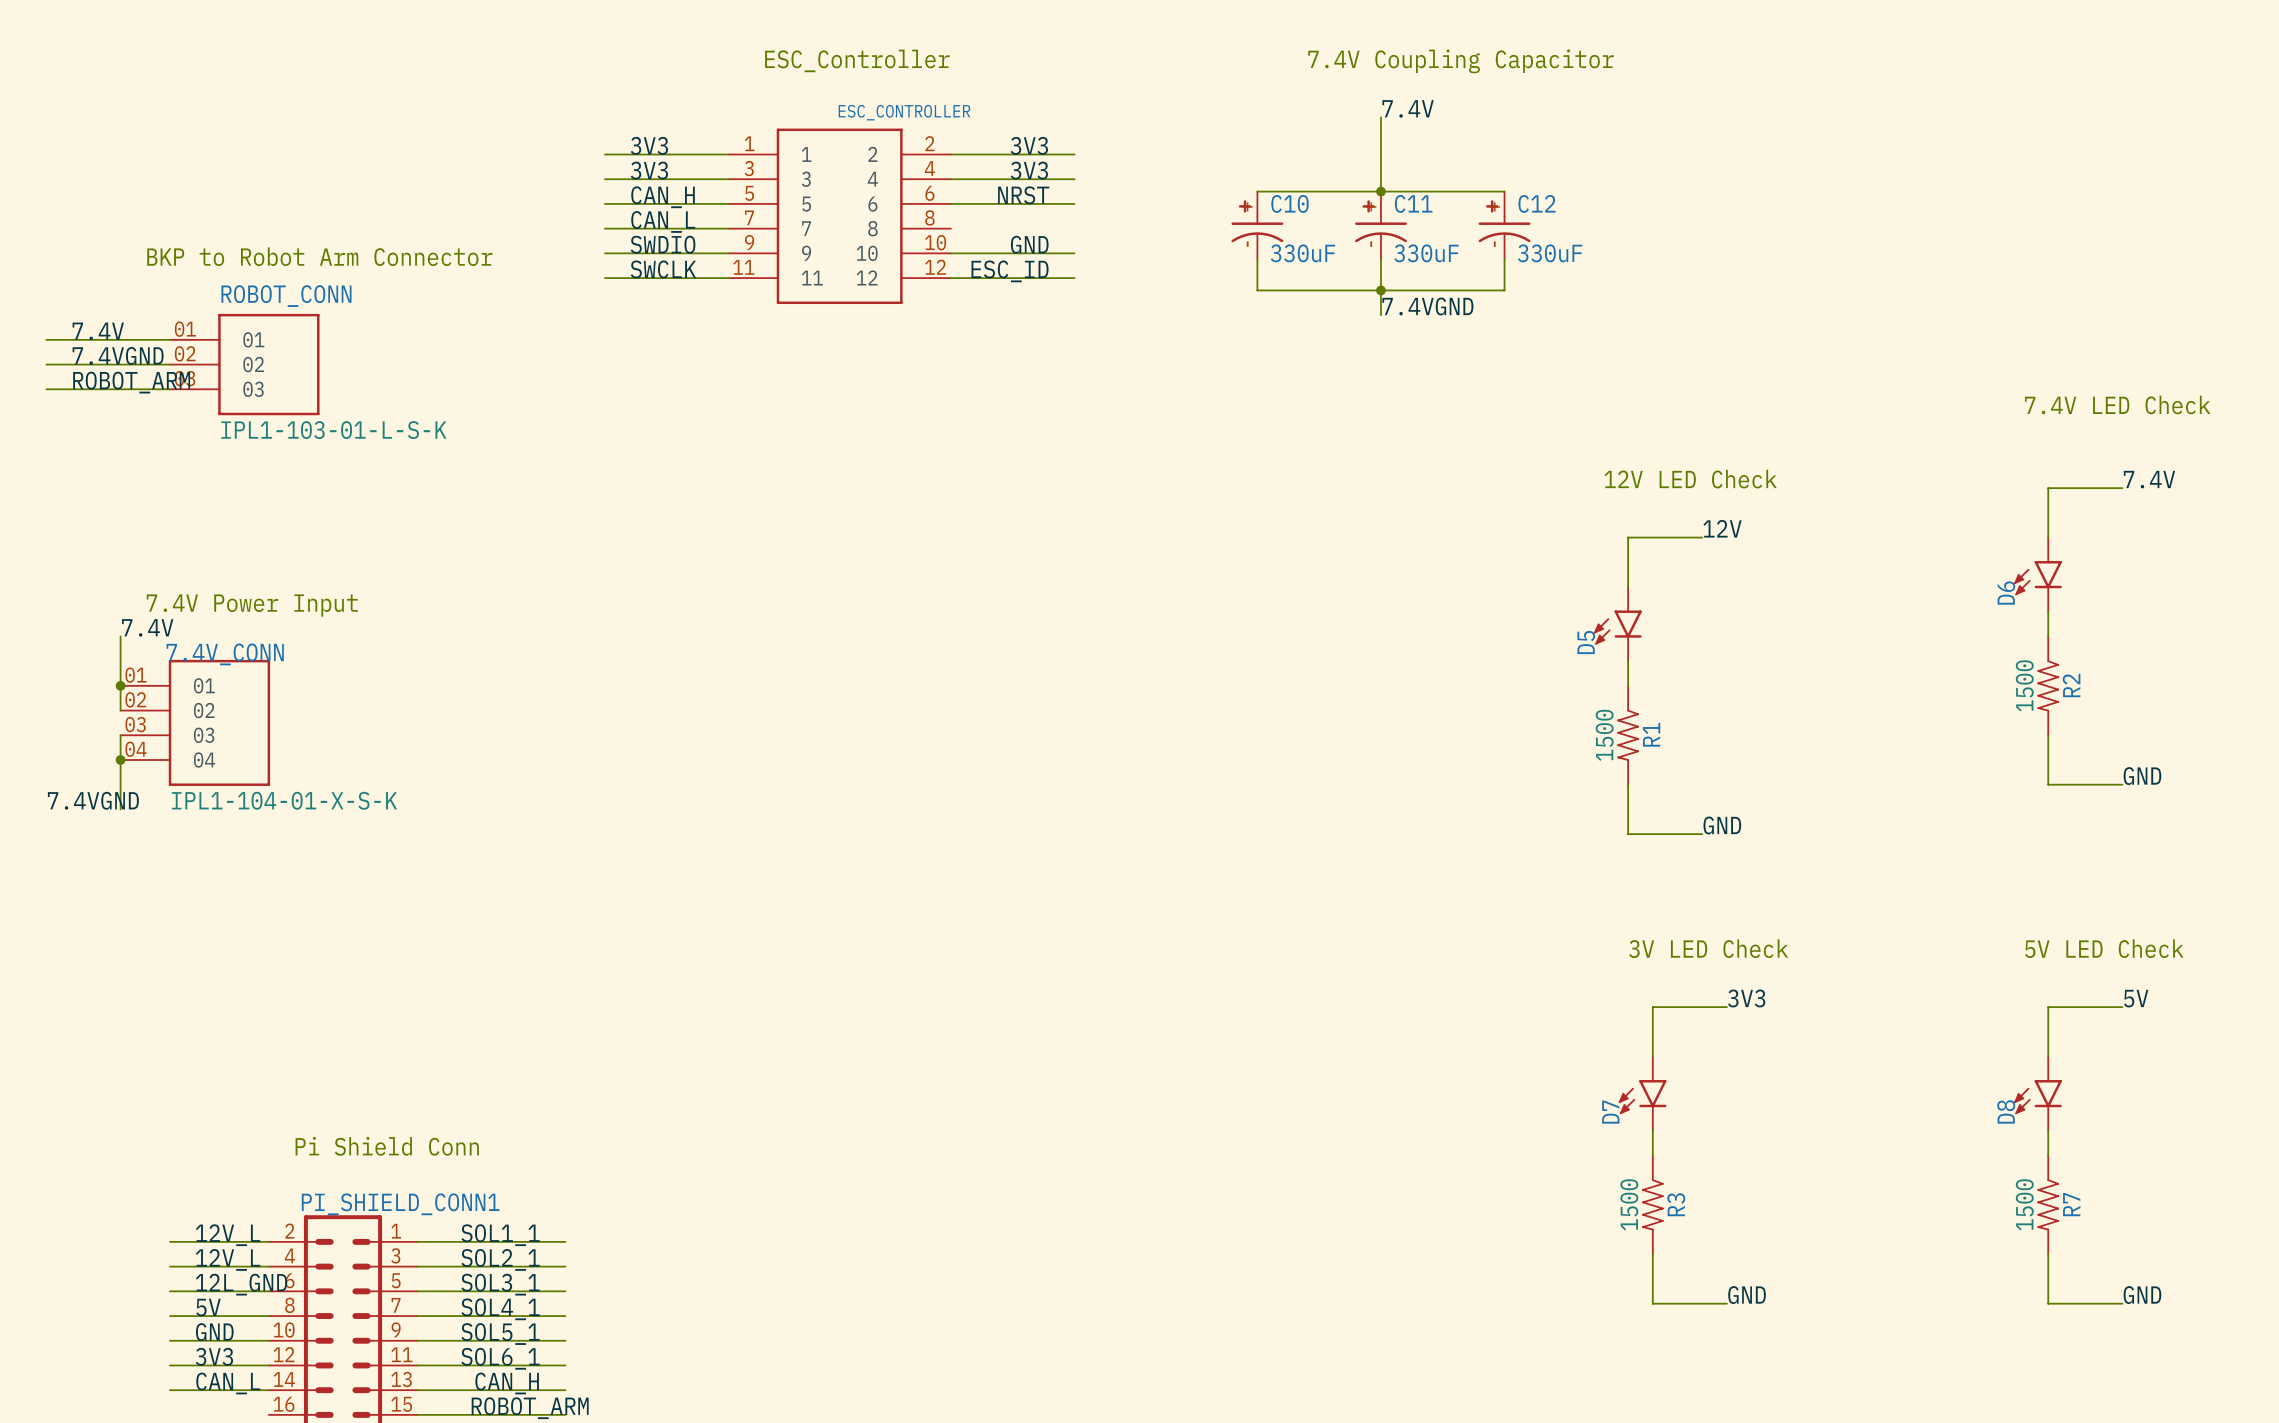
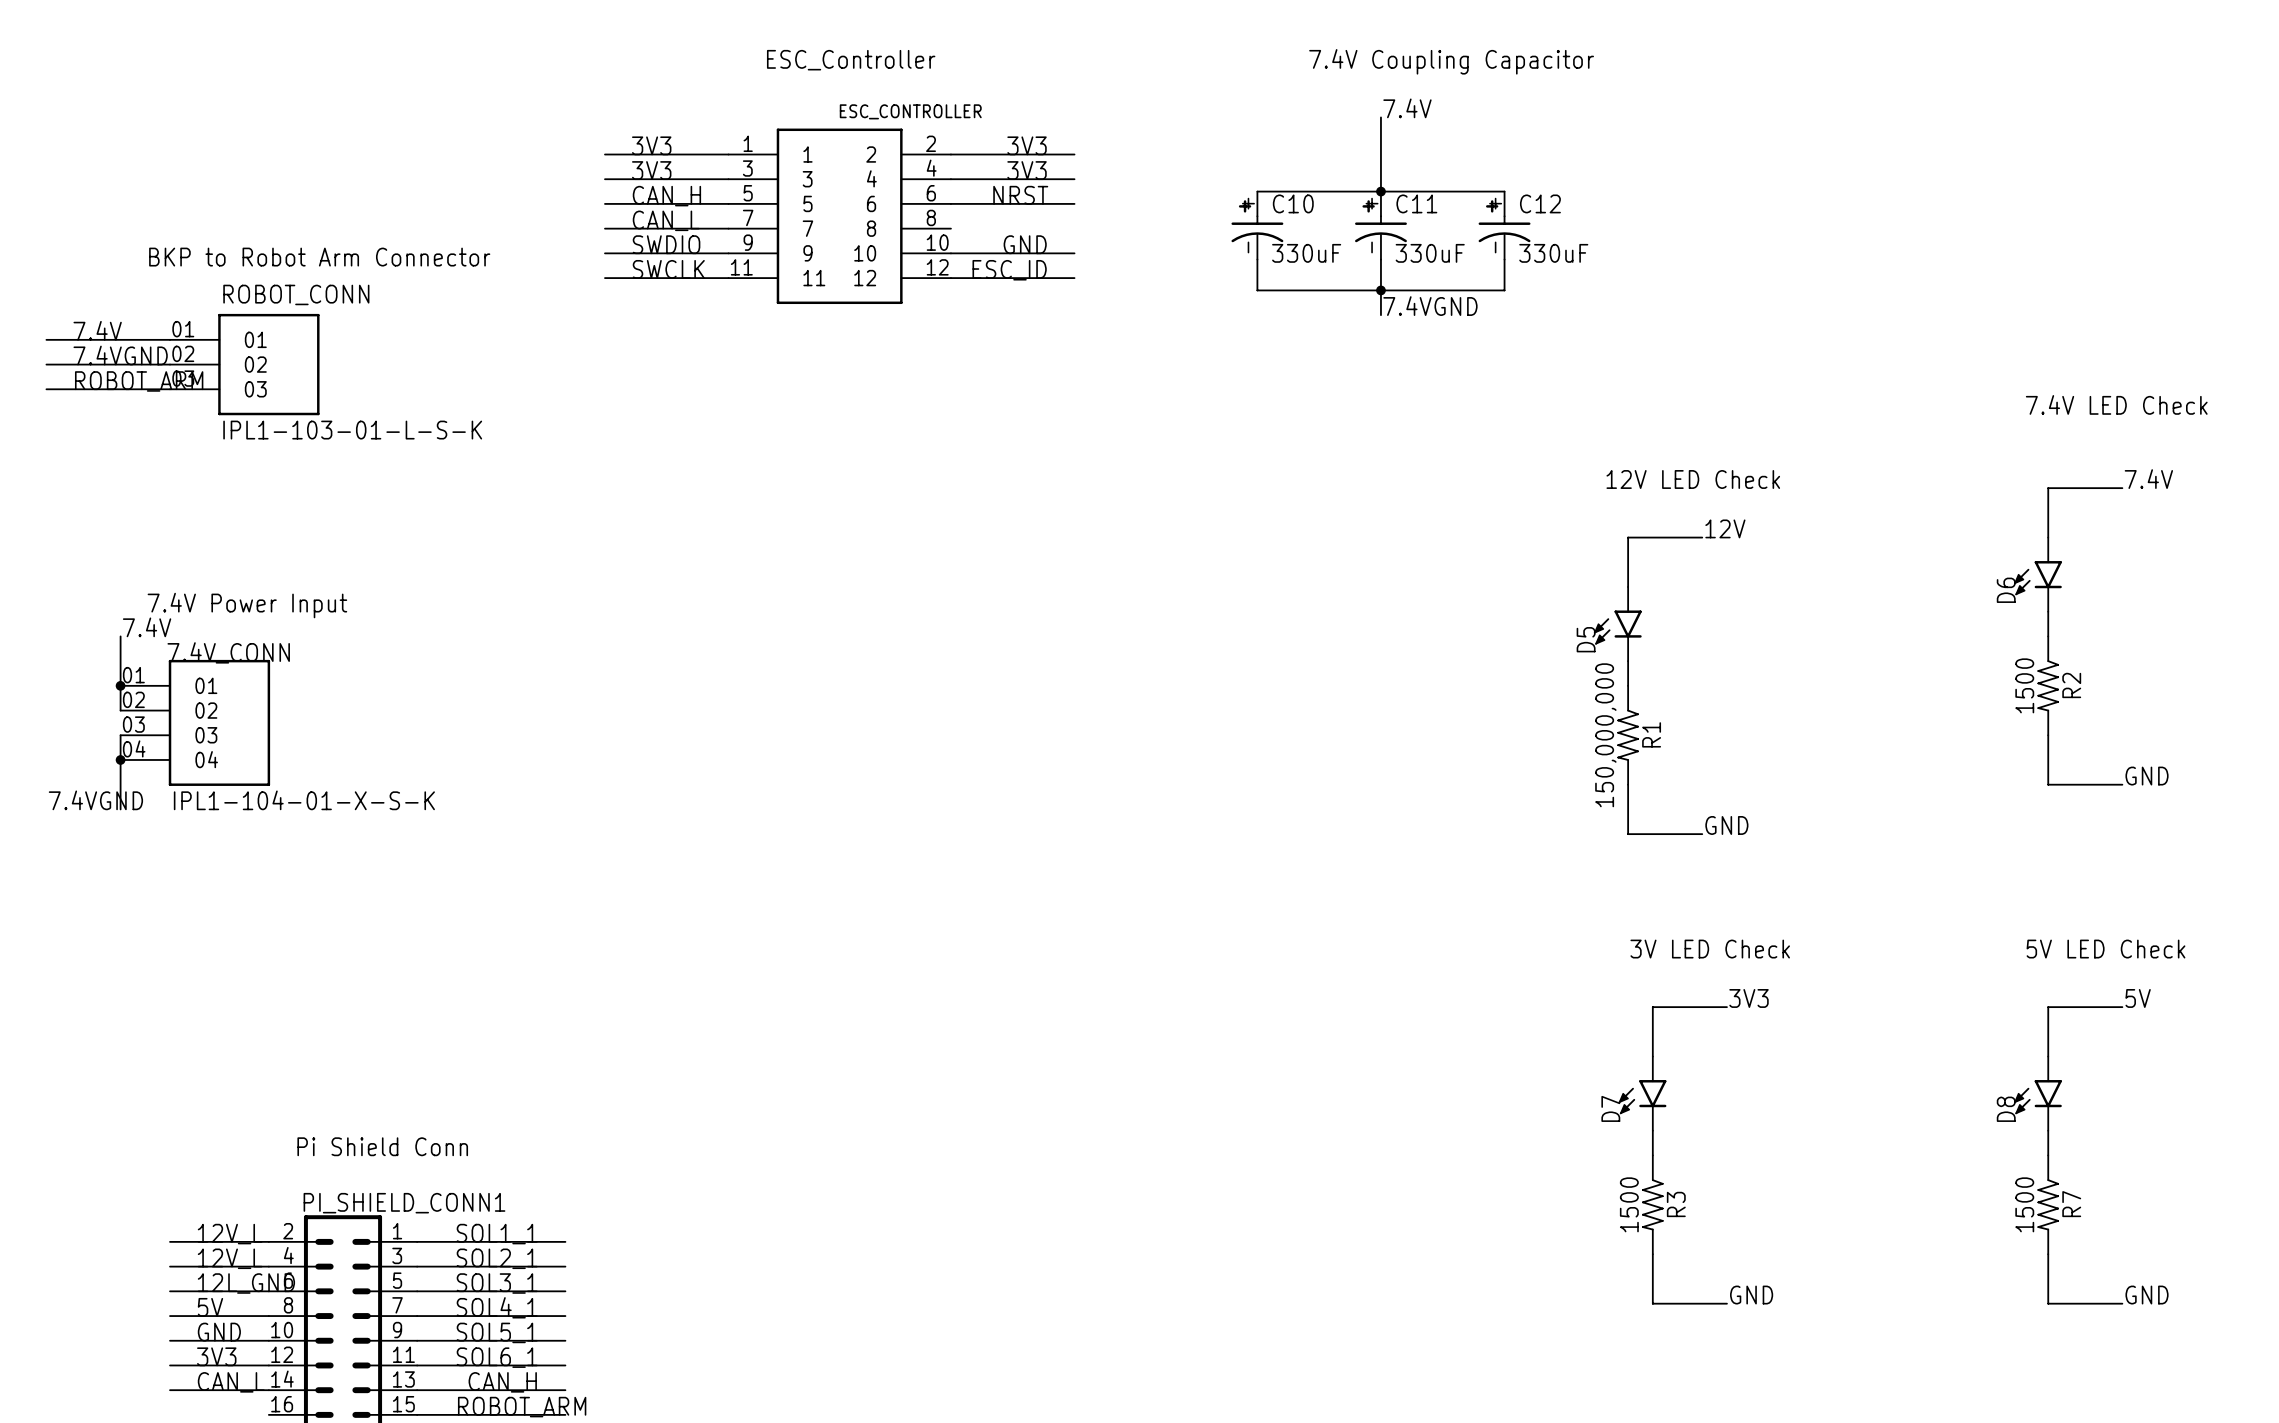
R1 value: 1500 (1604, 735) -> 150,000,000 (1605, 735)

